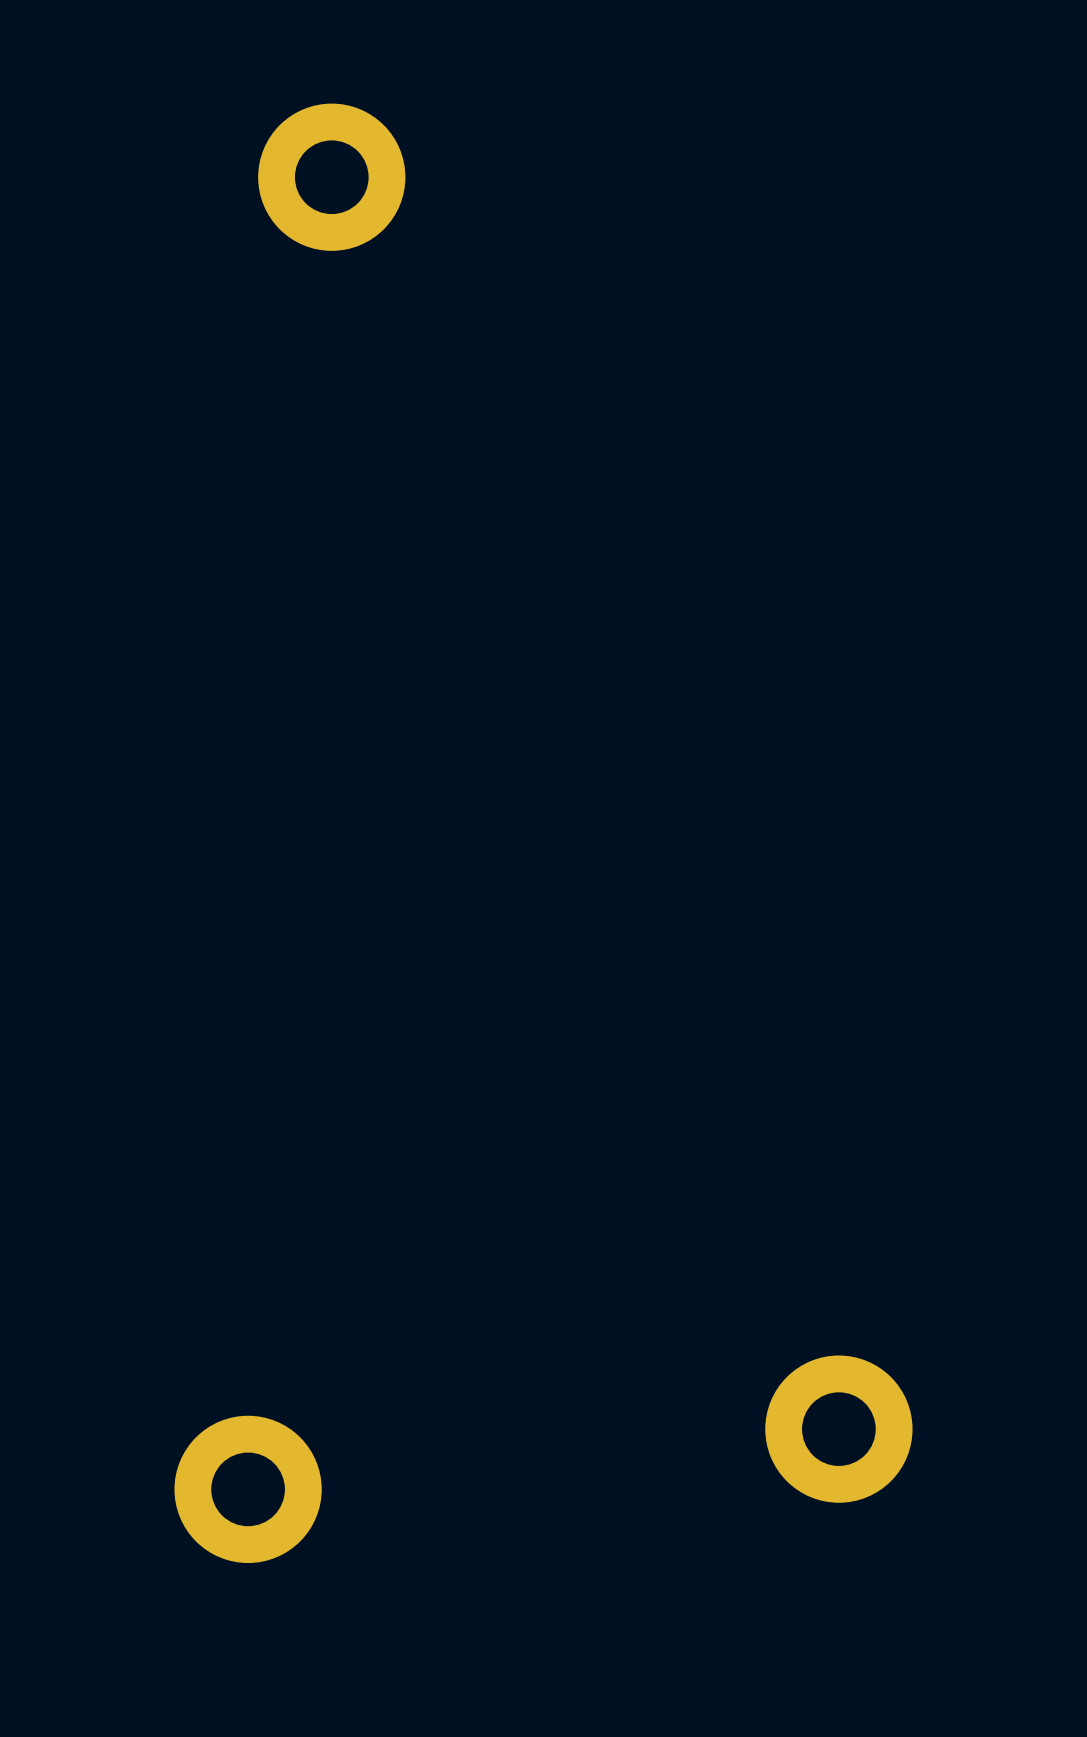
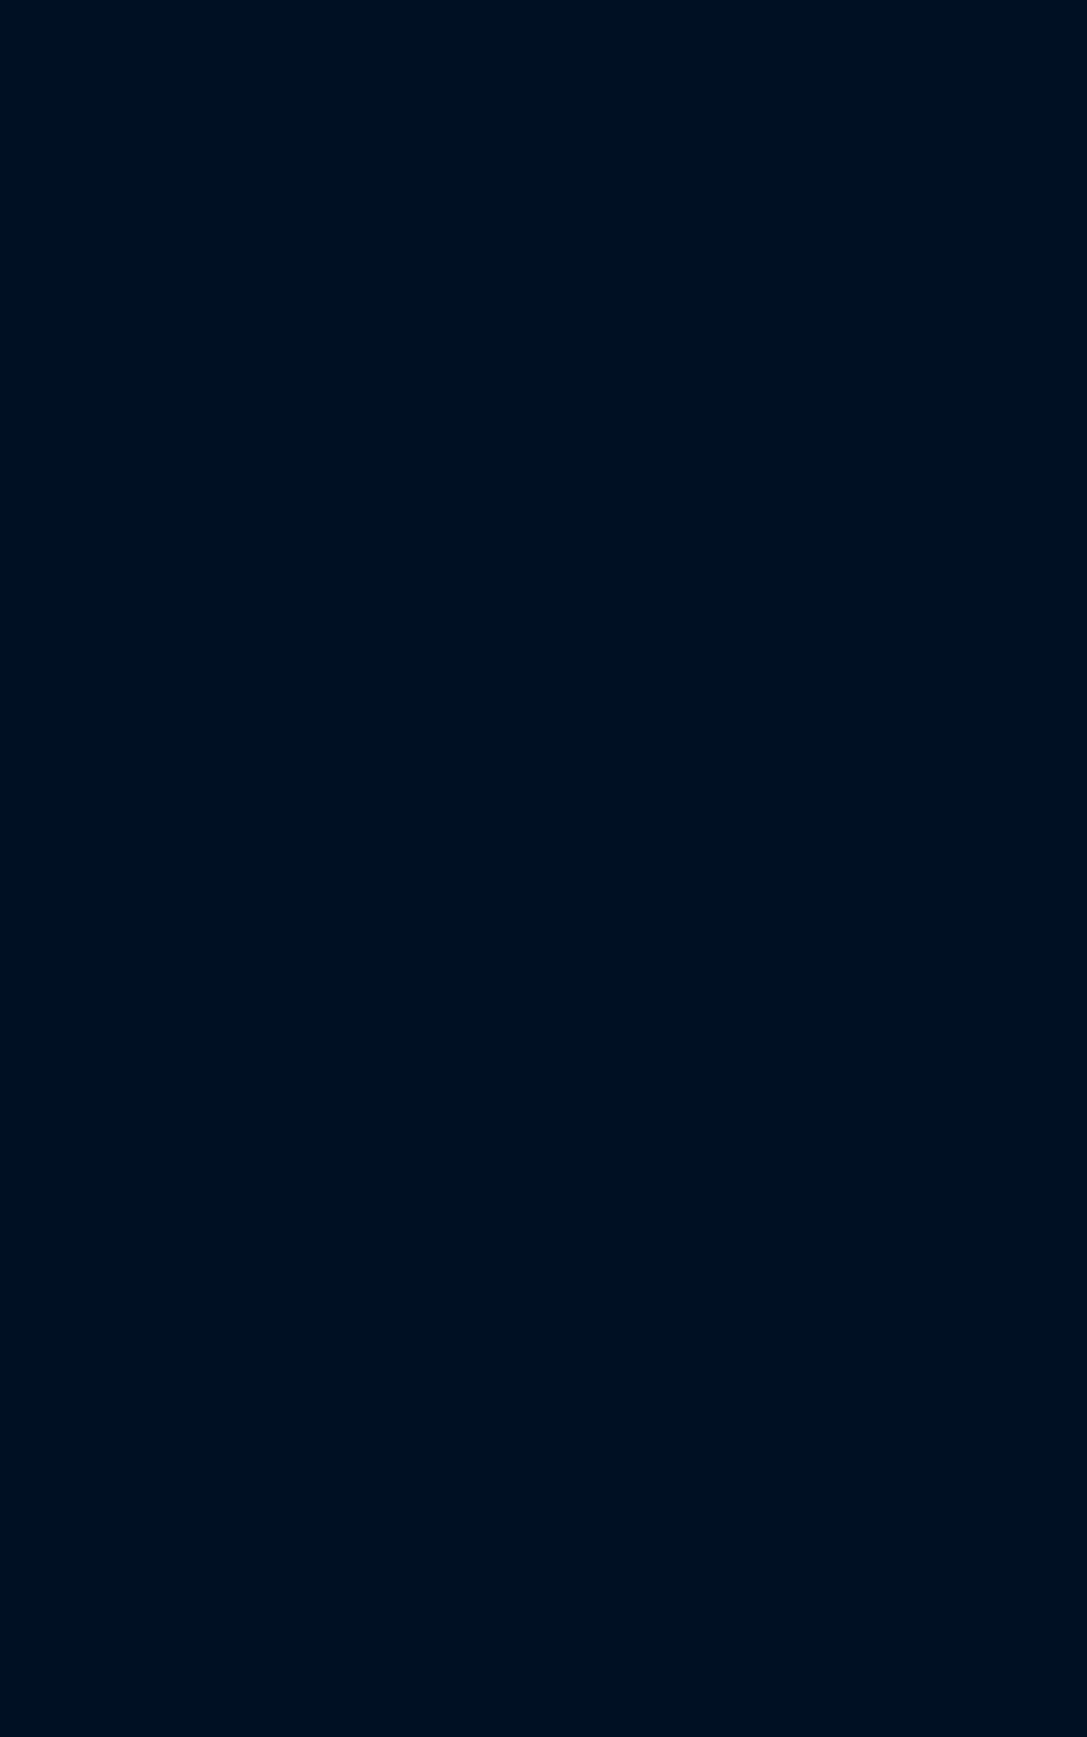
part: (331, 177) -> none
part: (838, 1429) -> none
part: (248, 1489) -> none

